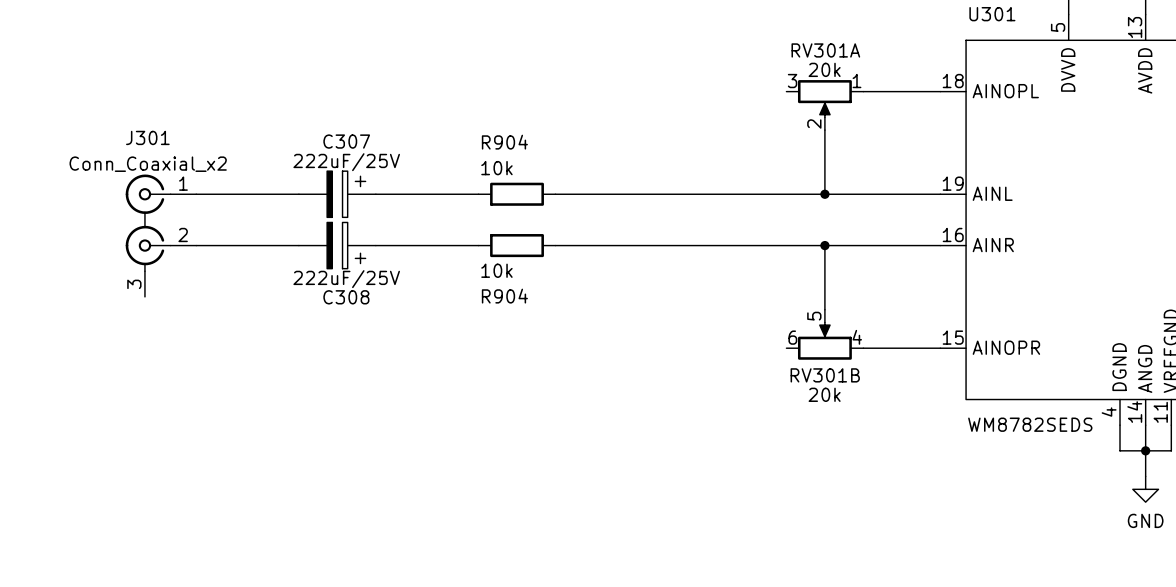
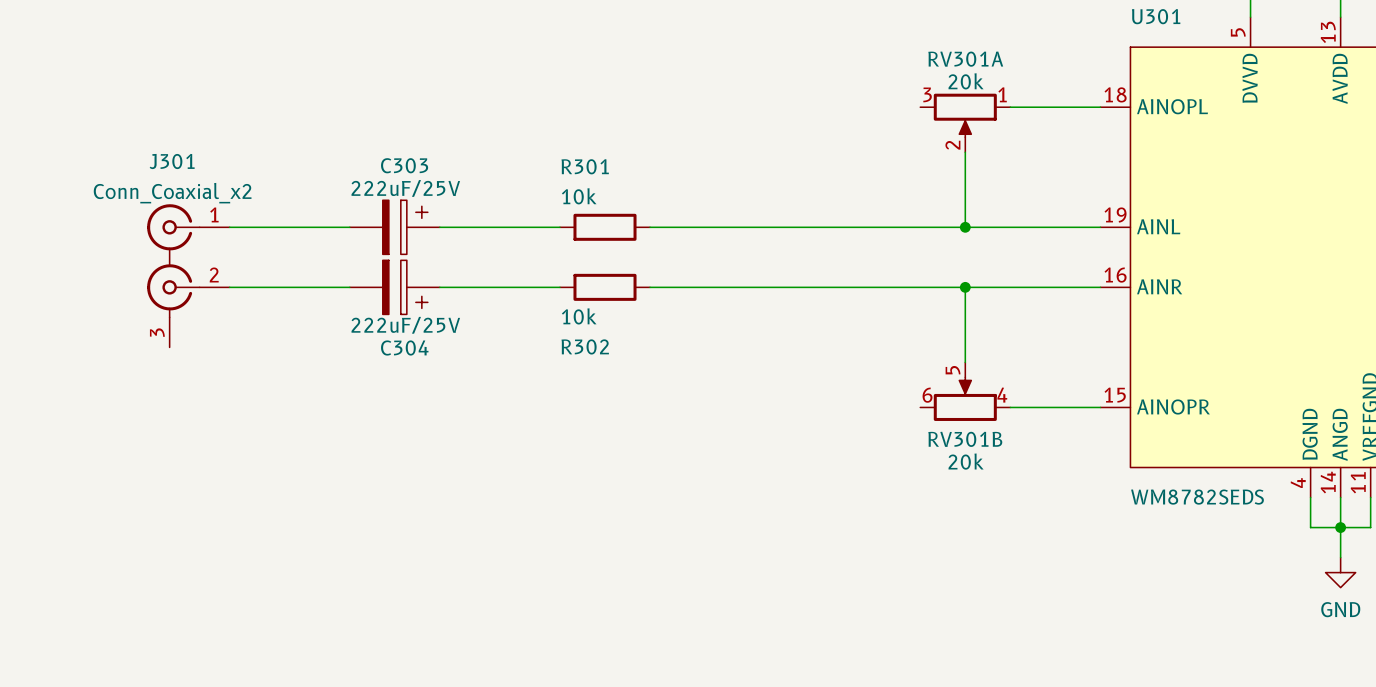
C307 name: C307 (346, 141) -> C303 (404, 165)
R904 name: R904 (504, 142) -> R301 (585, 166)
R904 name: R904 (504, 296) -> R302 (585, 346)
C308 name: C308 (346, 297) -> C304 (404, 347)

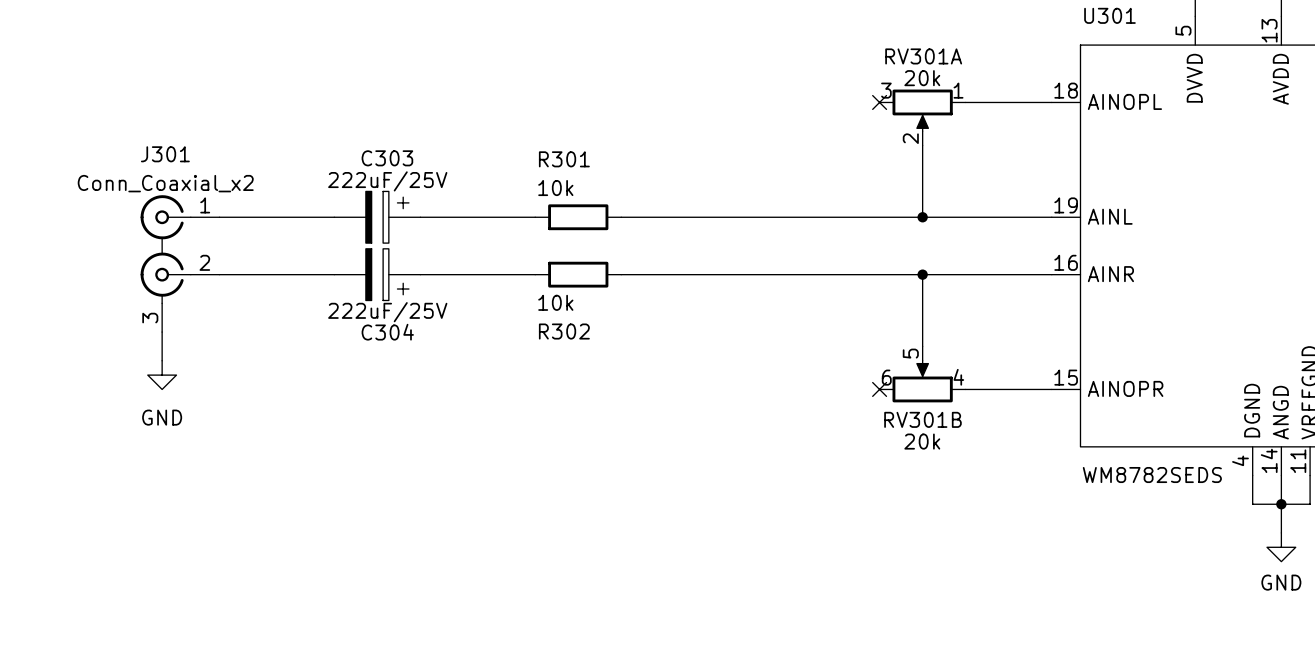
no-connect mark: none -> (879, 102)
wire: none -> (162, 332) (162, 360)
power symbol: none -> GND (162, 375)
no-connect mark: none -> (879, 389)

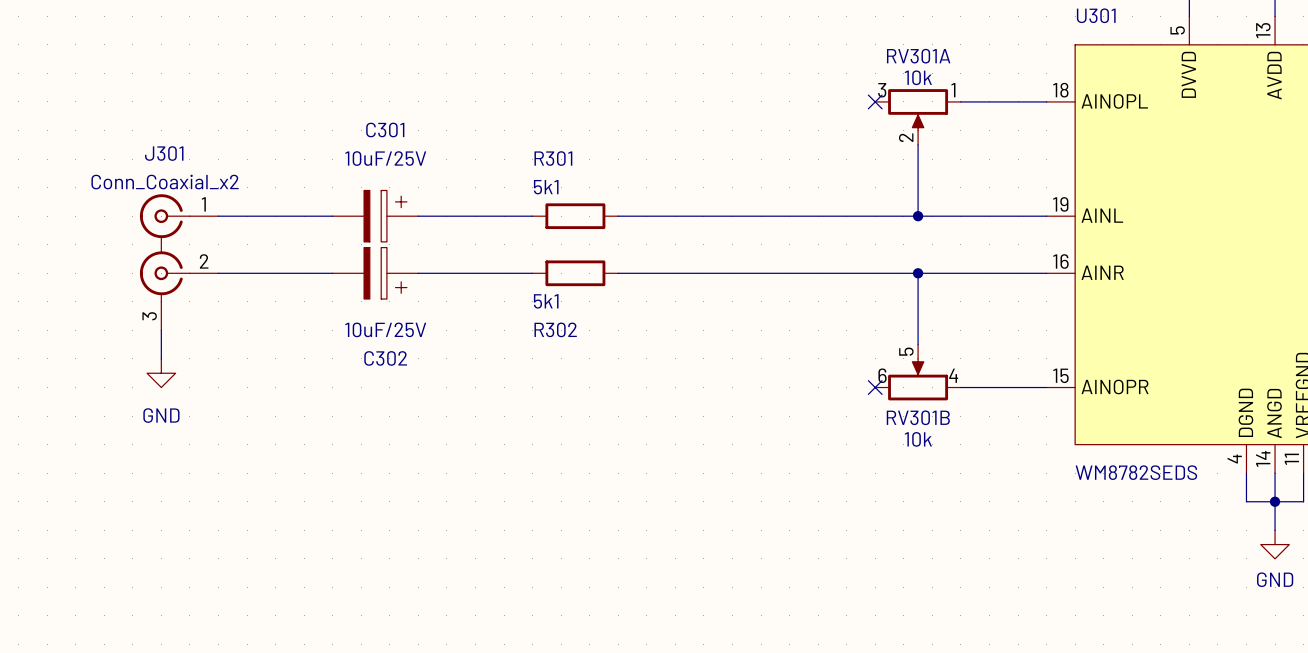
RV301A value: 20k (922, 78) -> 10k (918, 77)
C303 name: C303 (387, 158) -> C301 (385, 129)
C303 value: 222uF/25V (387, 181) -> 10uF/25V (385, 158)
R301 value: 10k (555, 188) -> 5k1 (546, 187)
R302 value: 10k (555, 302) -> 5k1 (546, 301)
C304 value: 222uF/25V (387, 312) -> 10uF/25V (385, 329)
C304 name: C304 (387, 332) -> C302 (385, 358)
RV301B value: 20k (922, 441) -> 10k (918, 439)

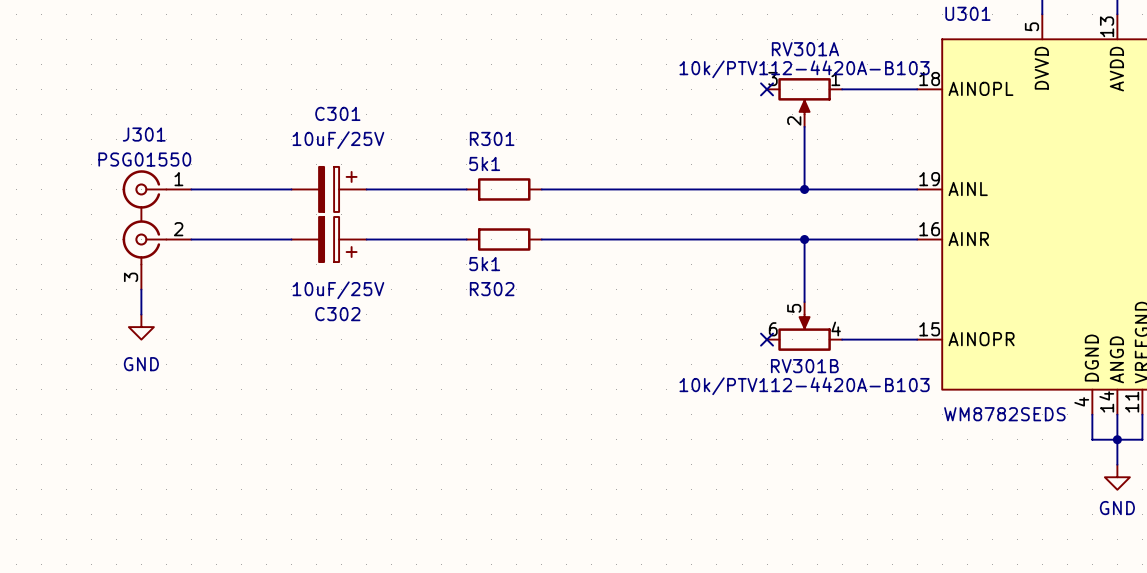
RV301A value: 10k (918, 77) -> 10k/PTV112-4420A-B103 (804, 69)
J301 value: Conn_Coaxial_x2 (165, 182) -> PSG01550 (144, 159)
RV301B value: 10k (918, 439) -> 10k/PTV112-4420A-B103 (804, 386)

